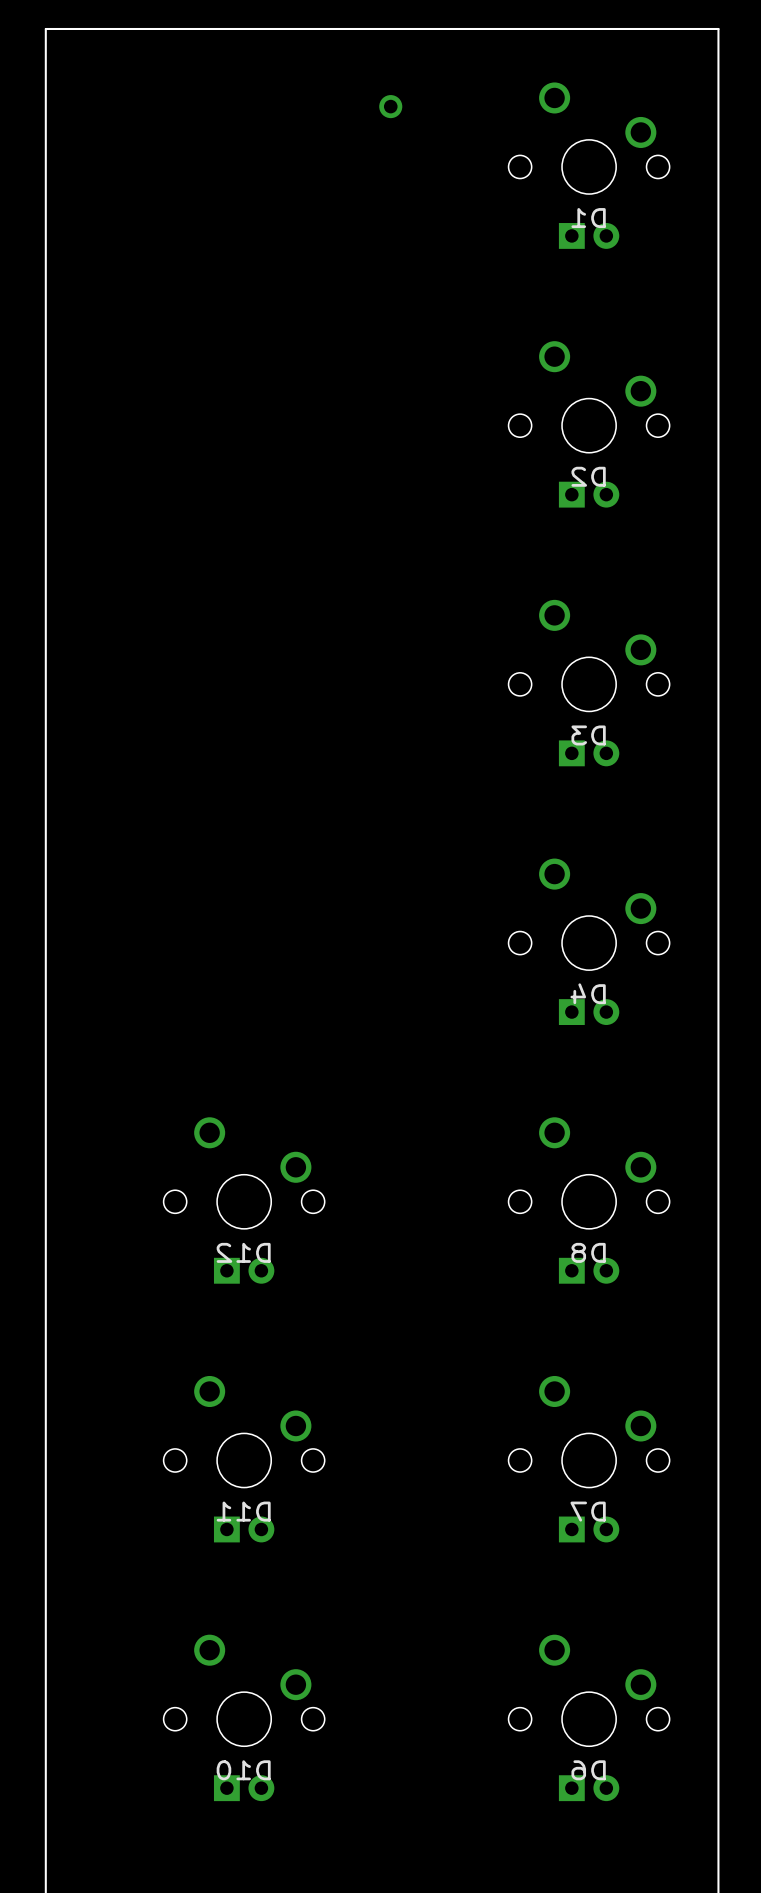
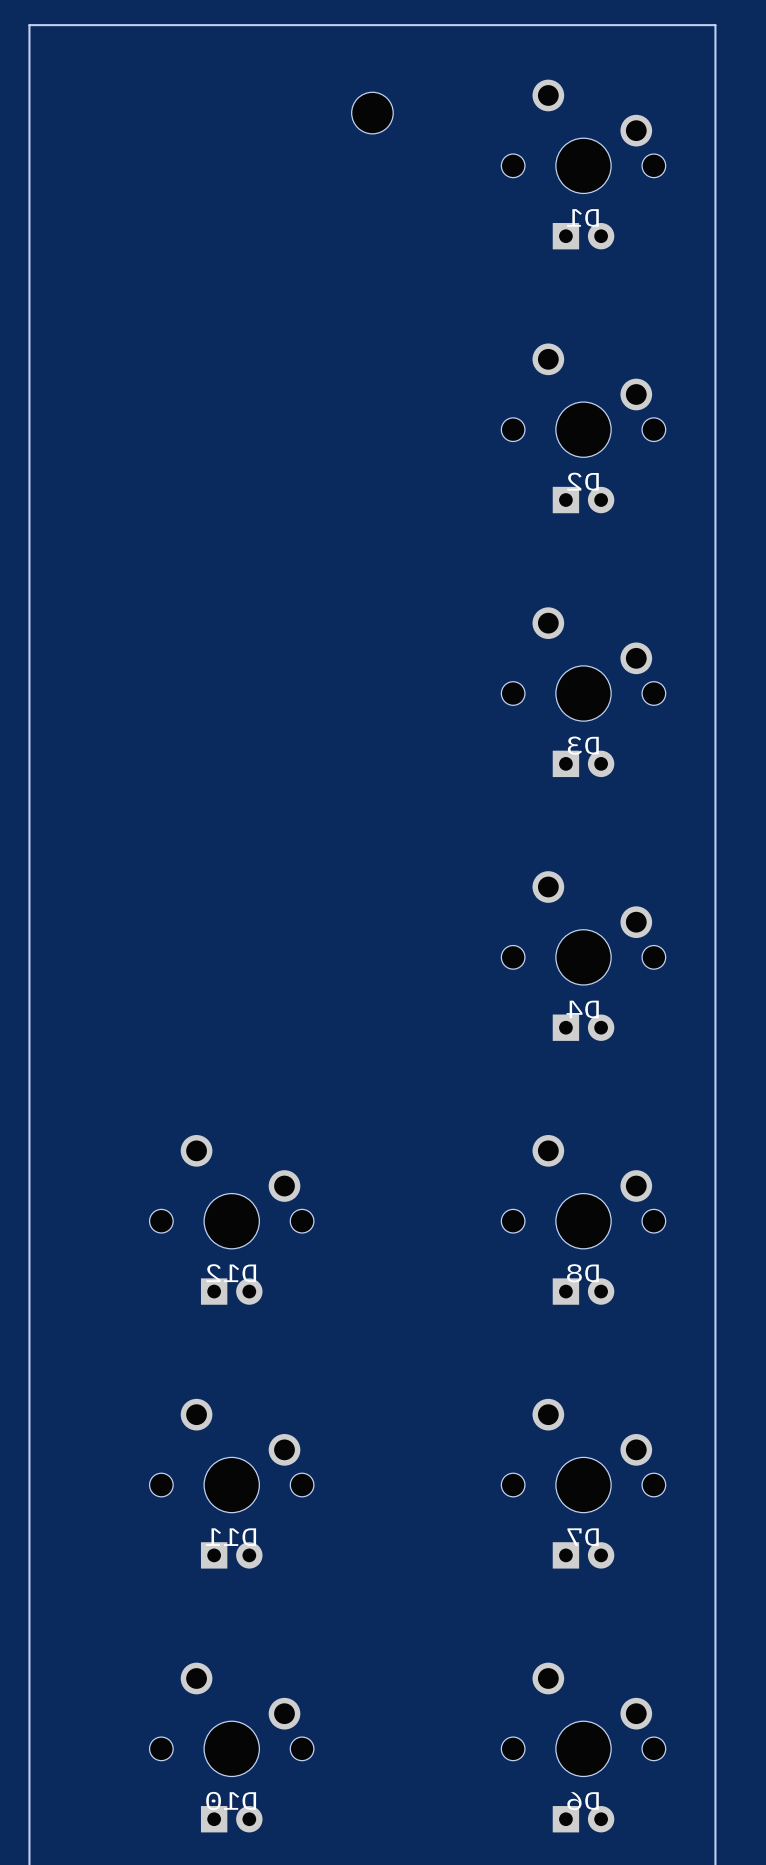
part footprint: [379, 95, 403, 119] -> [351, 92, 394, 134]

